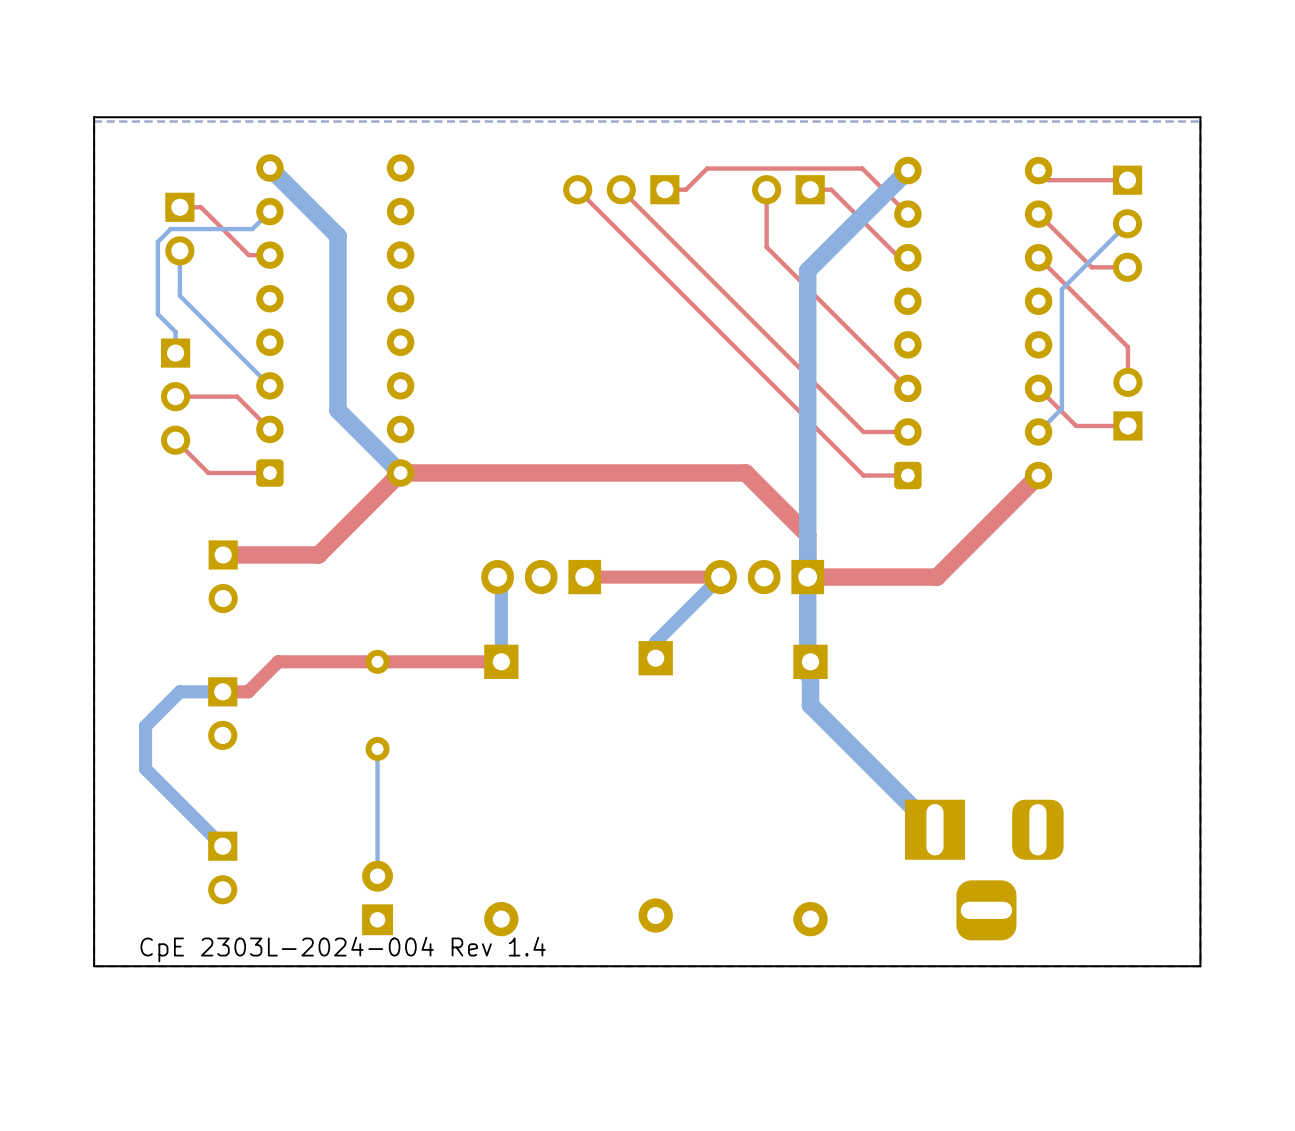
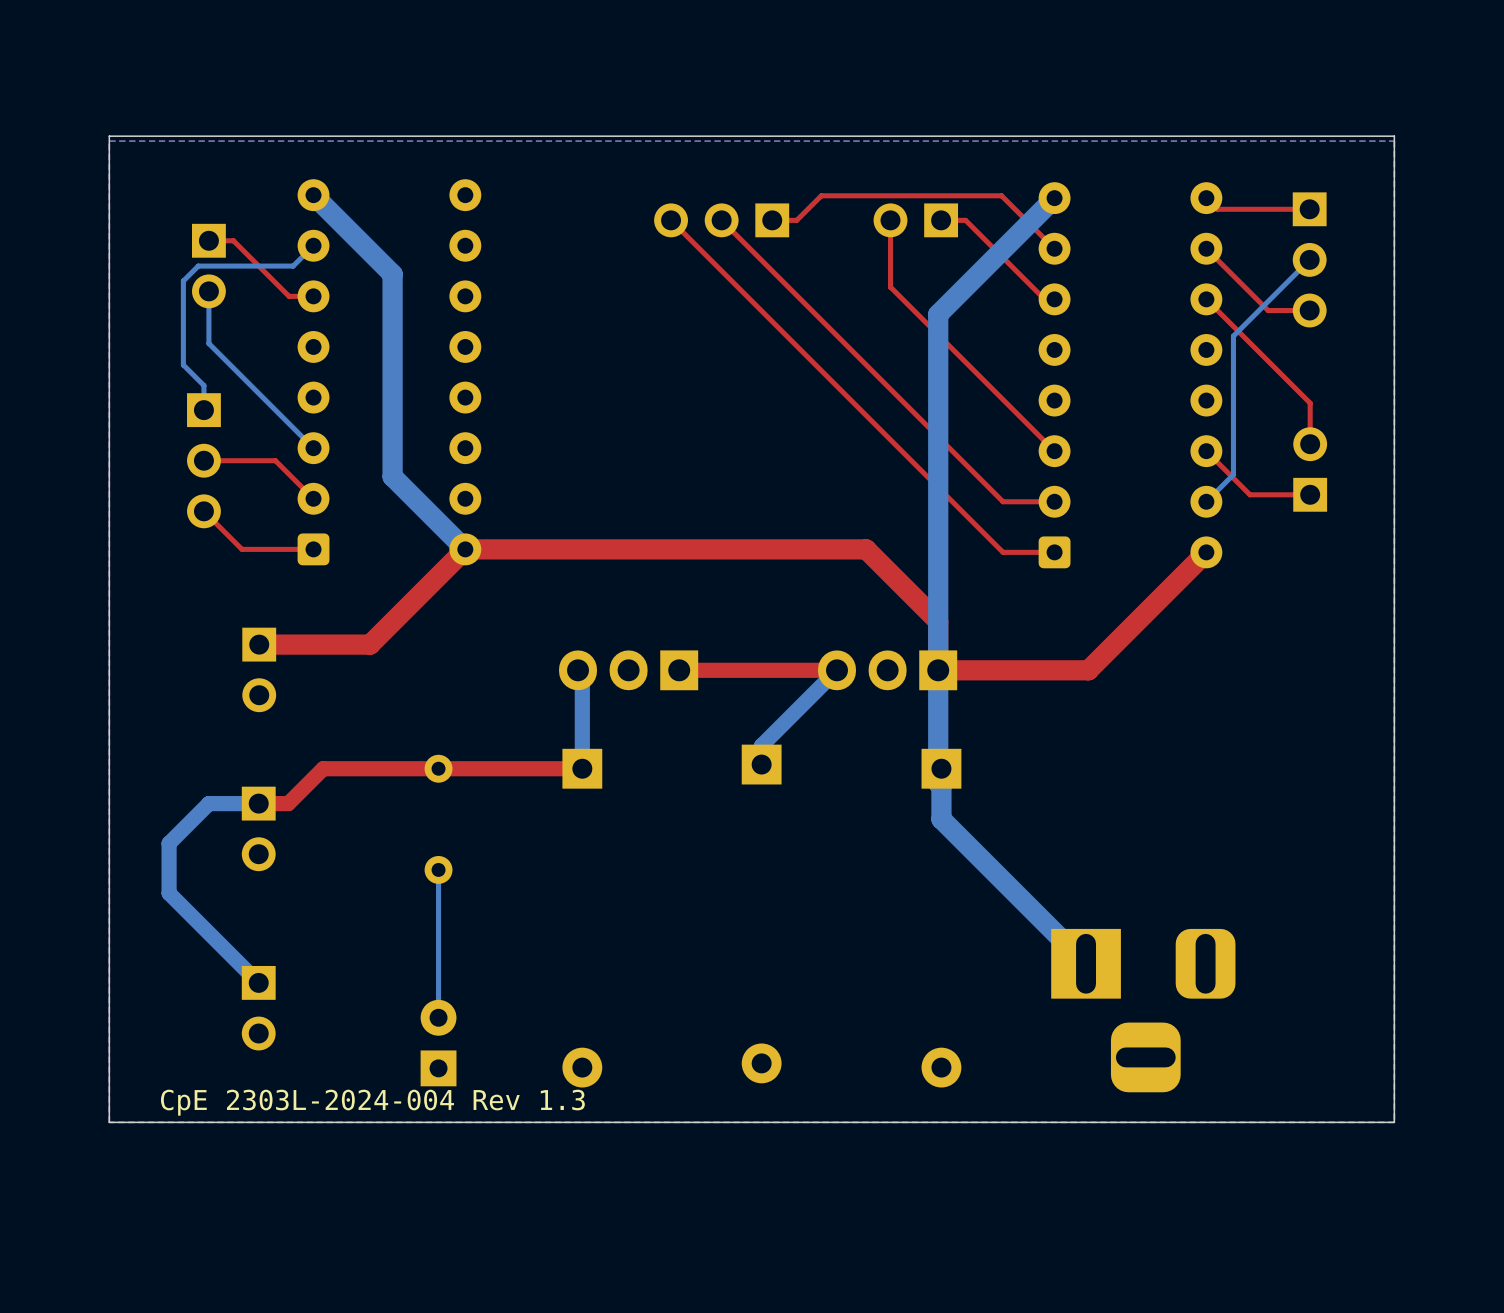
text: CpE 2303L-2024-004 Rev 1.4 (343, 949) -> CpE 2303L-2024-004 Rev 1.3 (372, 1102)

